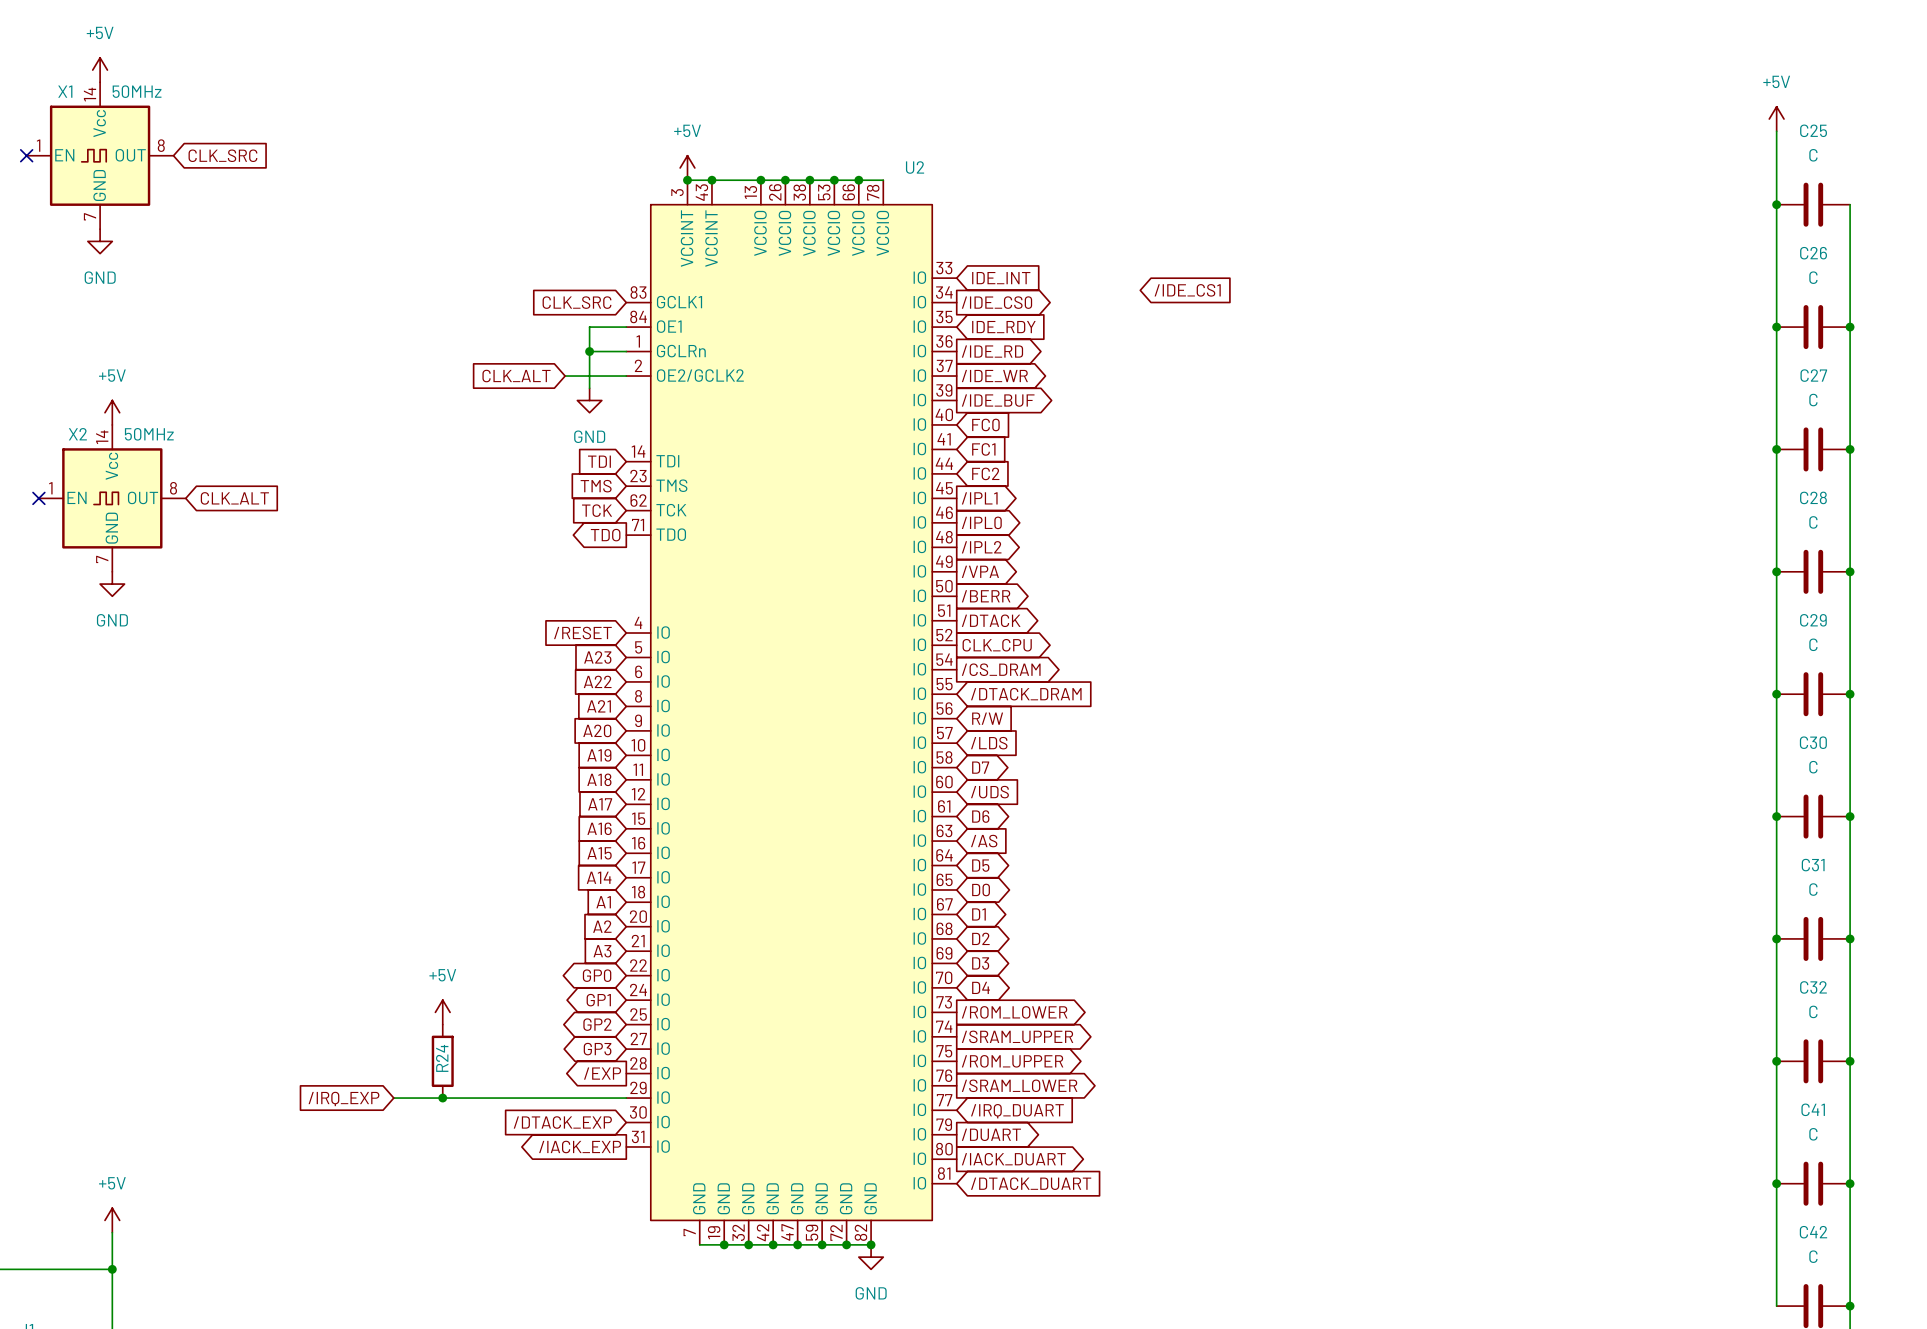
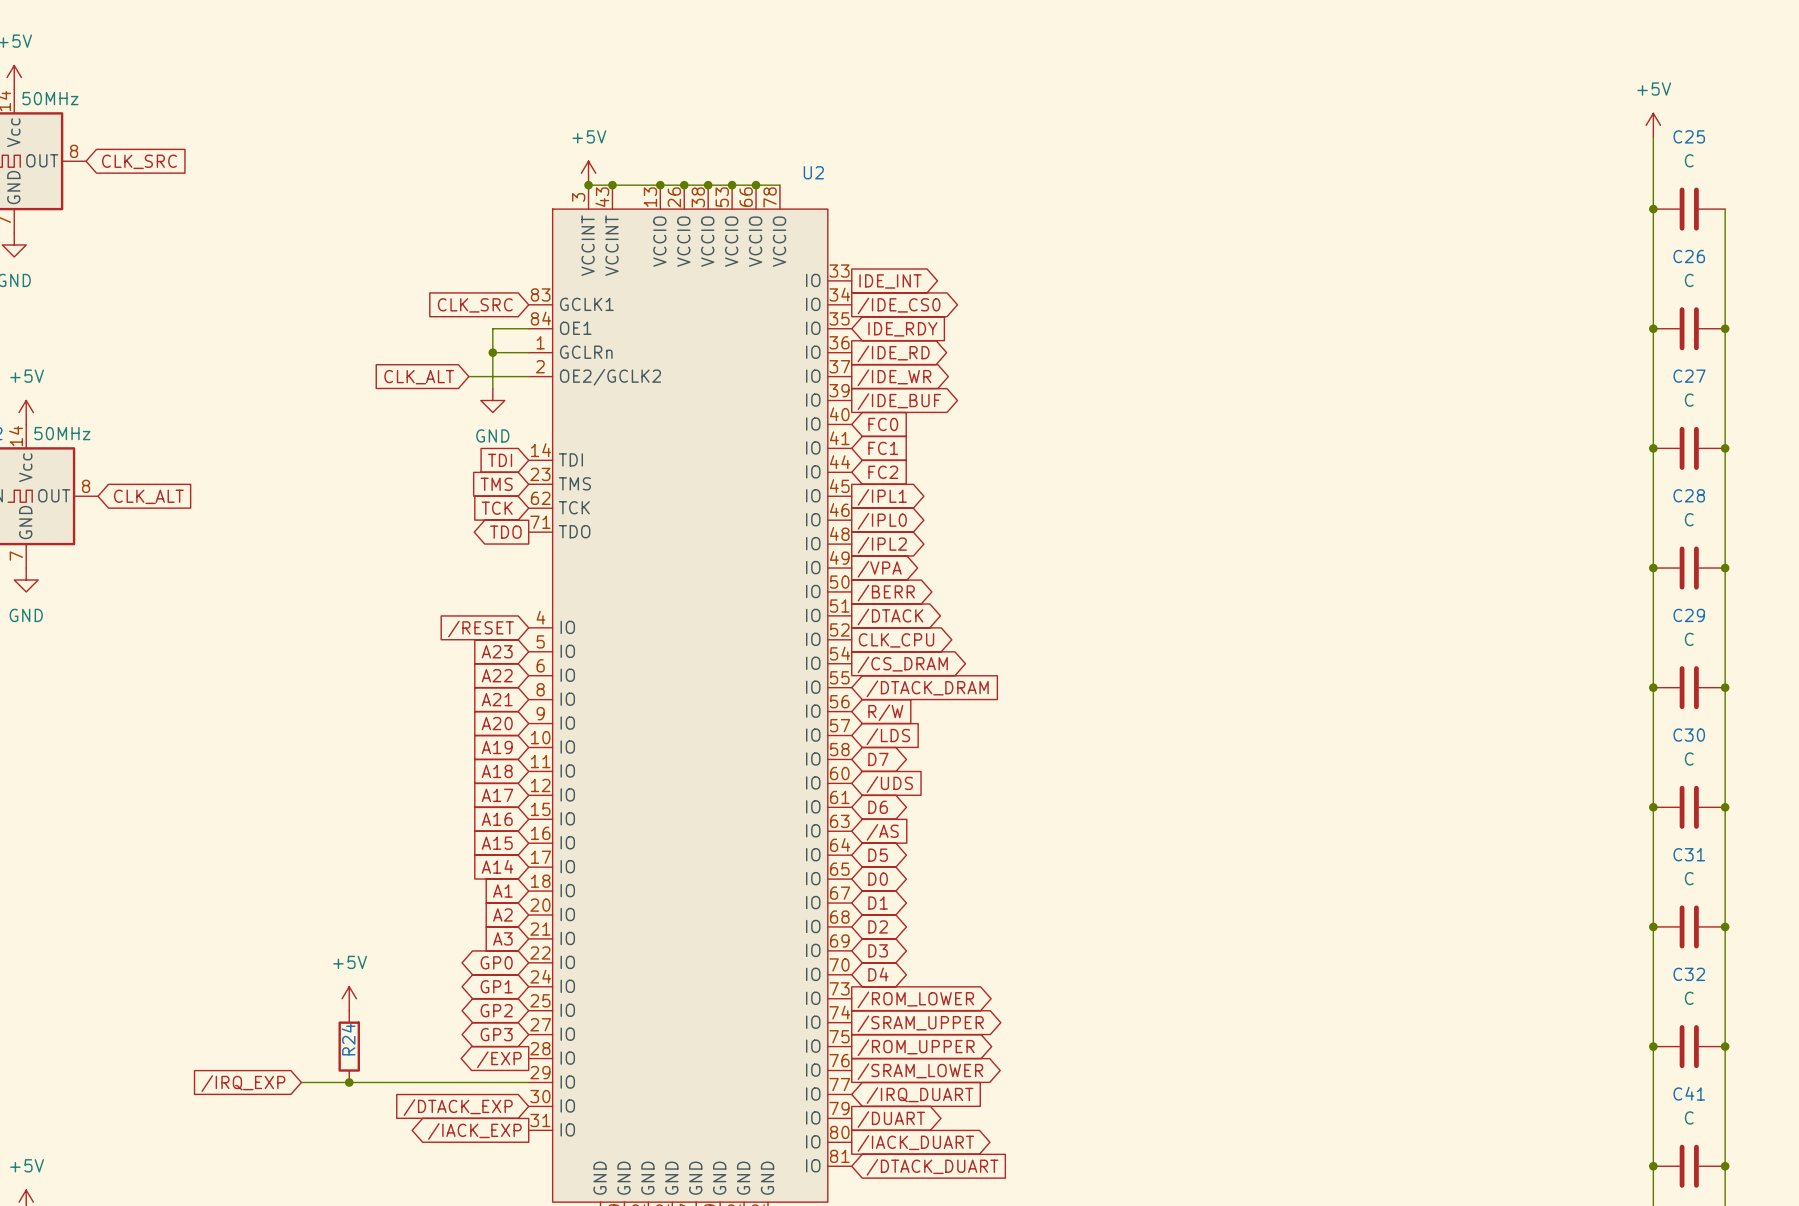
global label shape: input (1001, 278) -> output (890, 281)
global label: /IDE_CS1 (1187, 290) -> none

